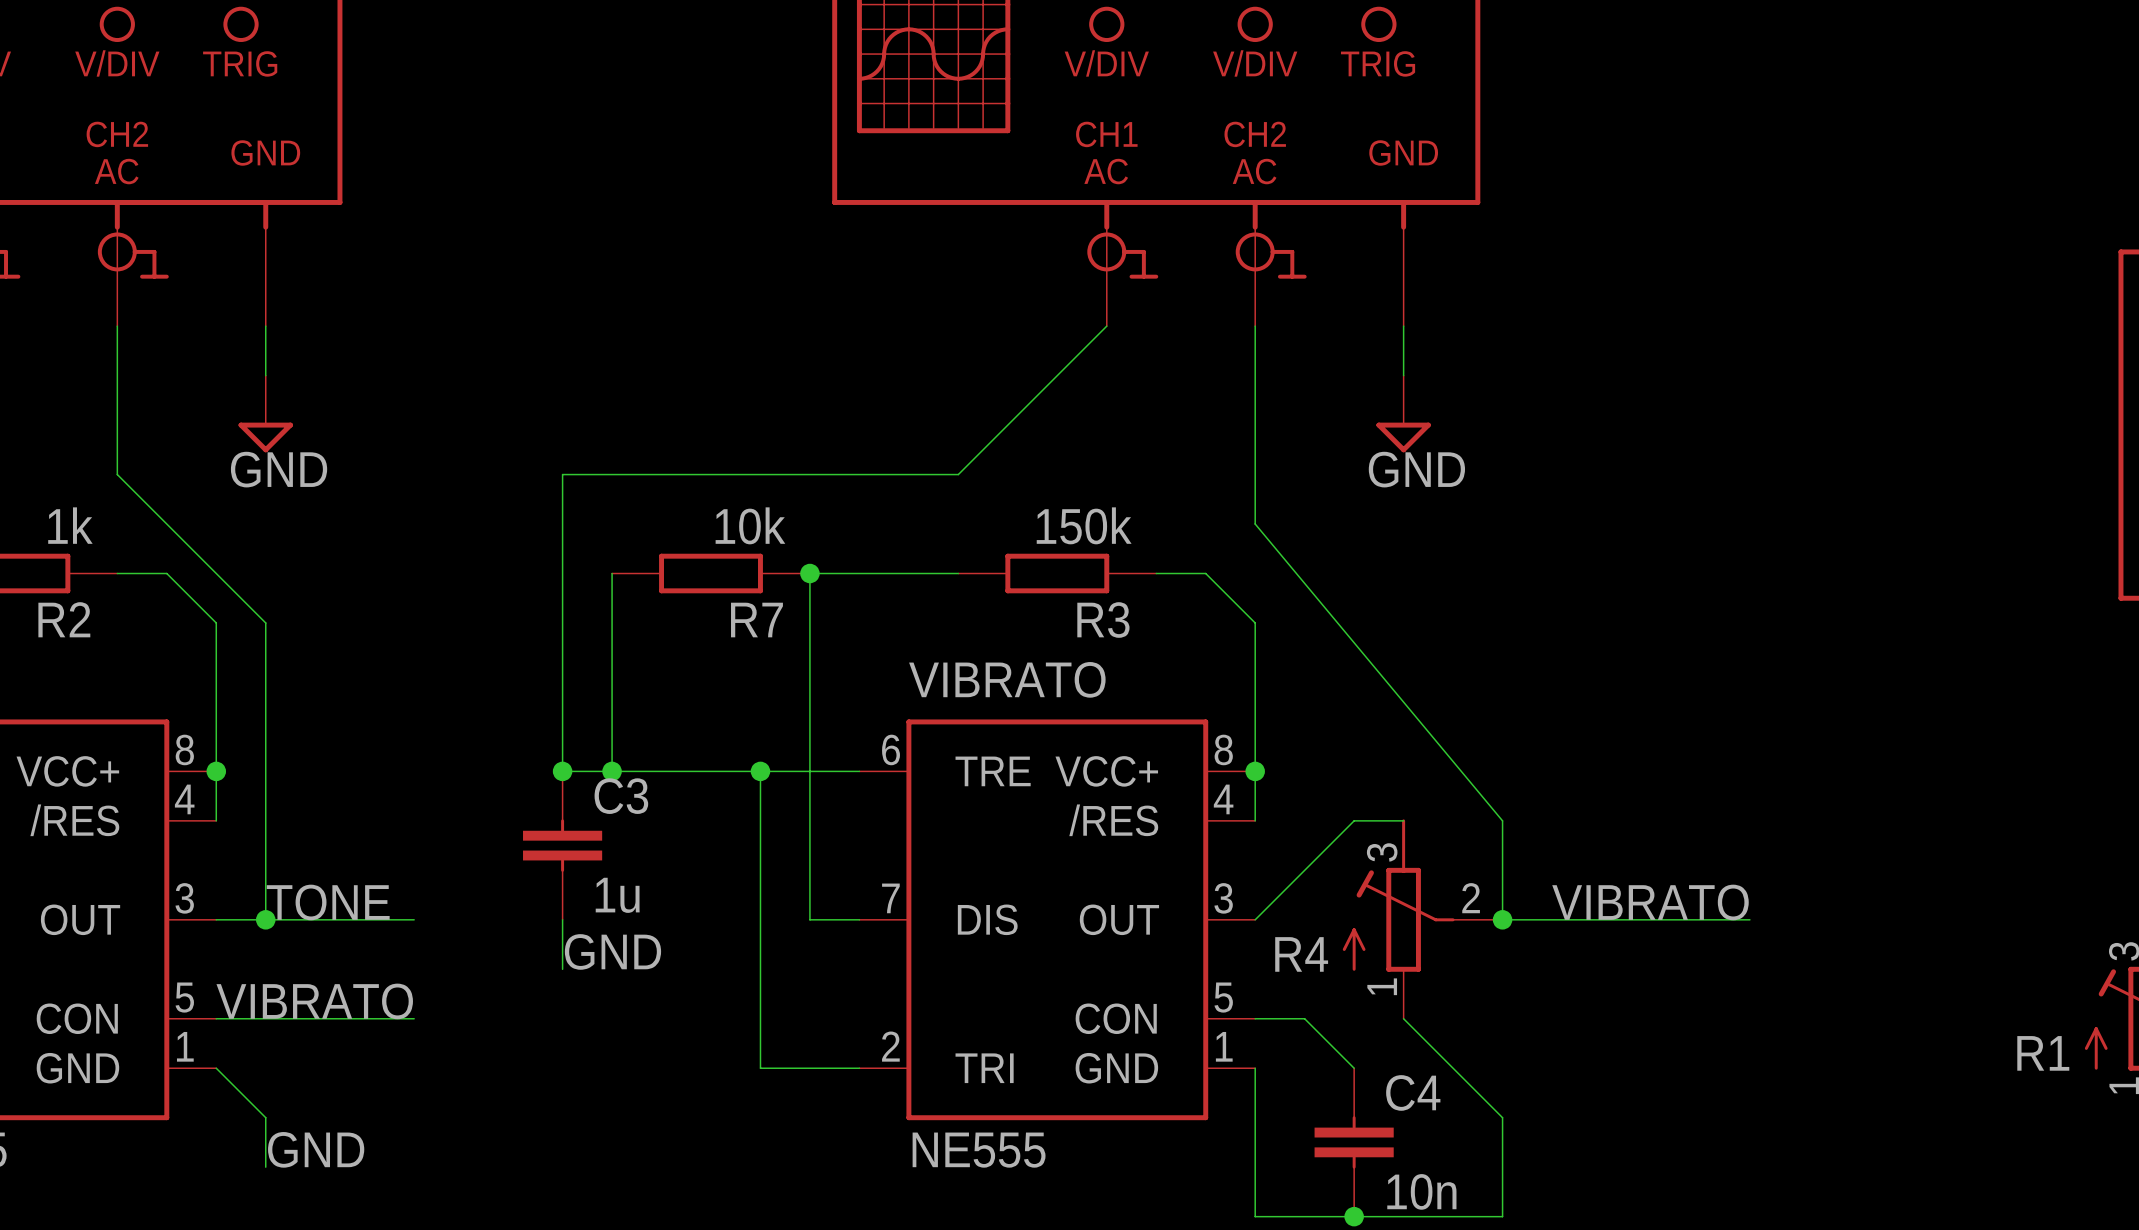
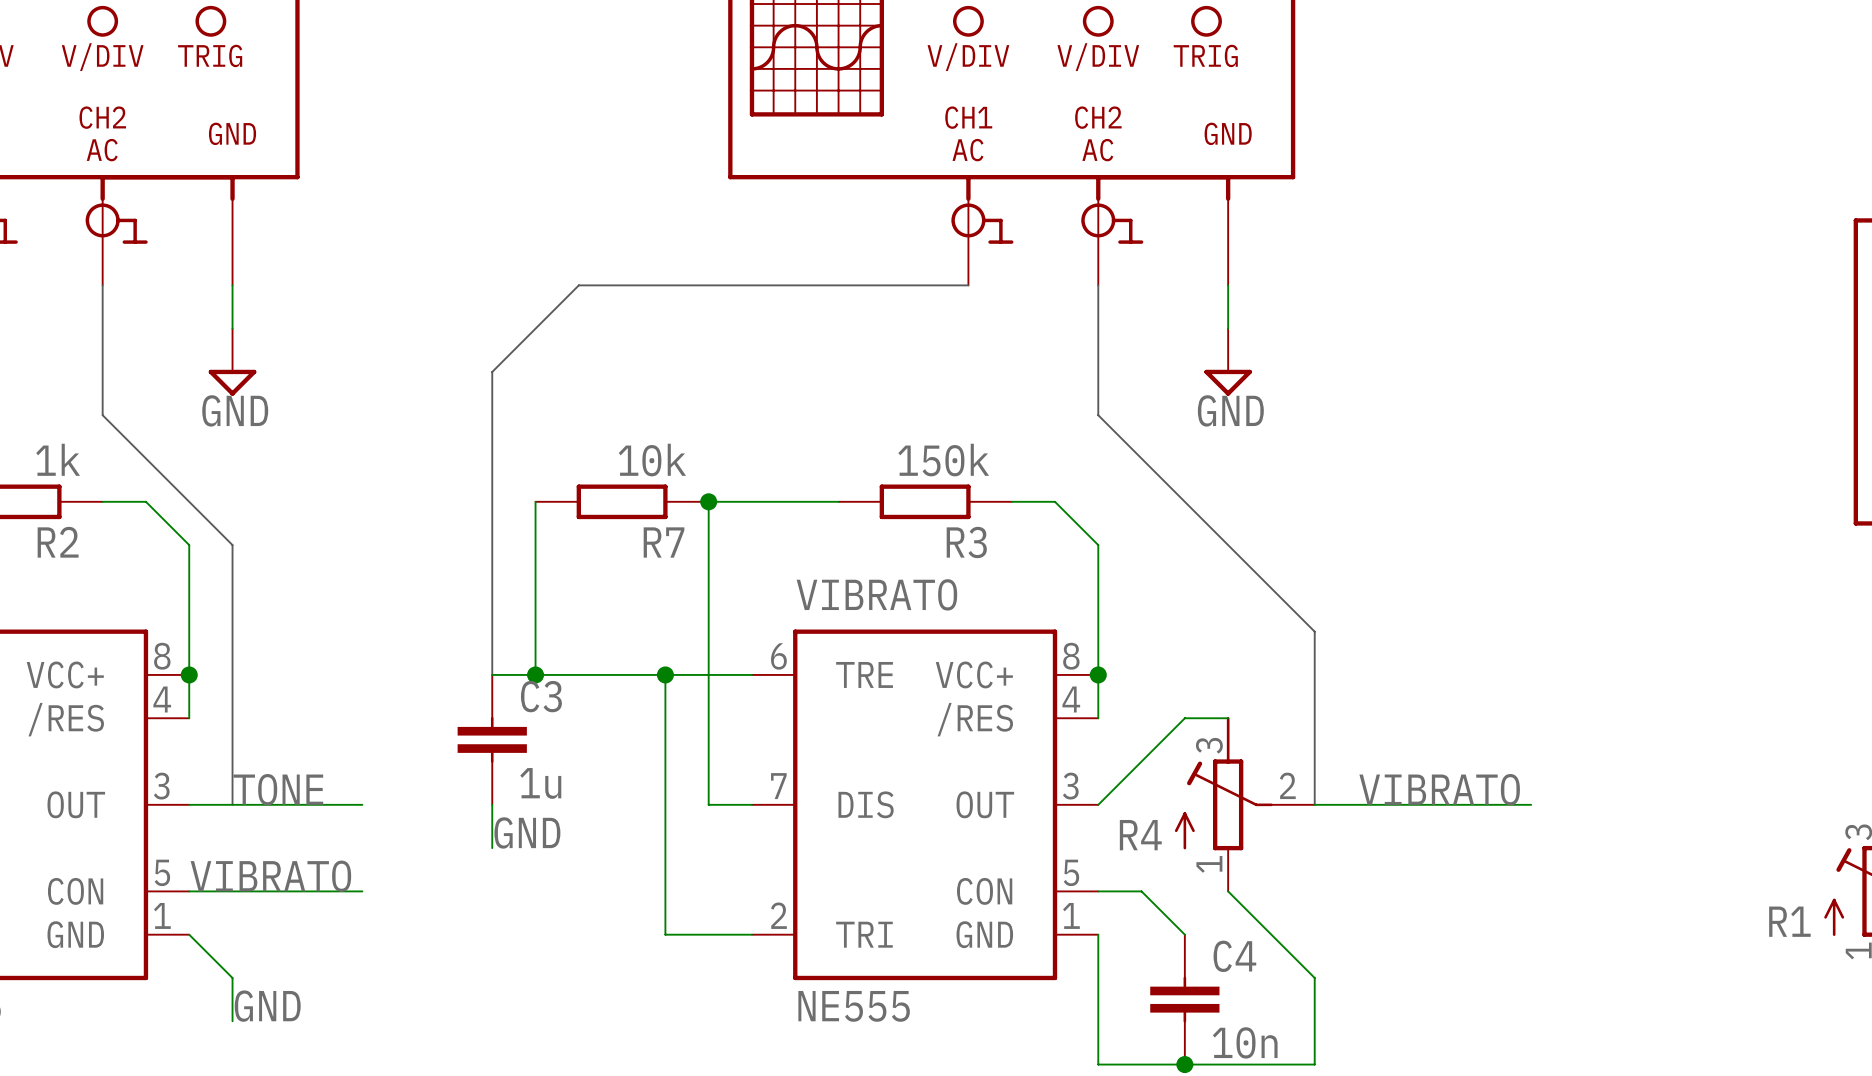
bus: none -> (102, 285) (102, 415) (232, 545) (232, 804)
wire: (1106, 326) (958, 474) (562, 474) (562, 771) -> none
bus: none -> (968, 285) (578, 285) (492, 371) (492, 674)
wire: (1255, 326) (1255, 524) (1502, 820) (1502, 919) -> none
bus: none -> (1098, 285) (1098, 415) (1314, 631) (1314, 804)
junction: (562, 771) -> none
junction: (265, 919) -> none
junction: (1502, 919) -> none

